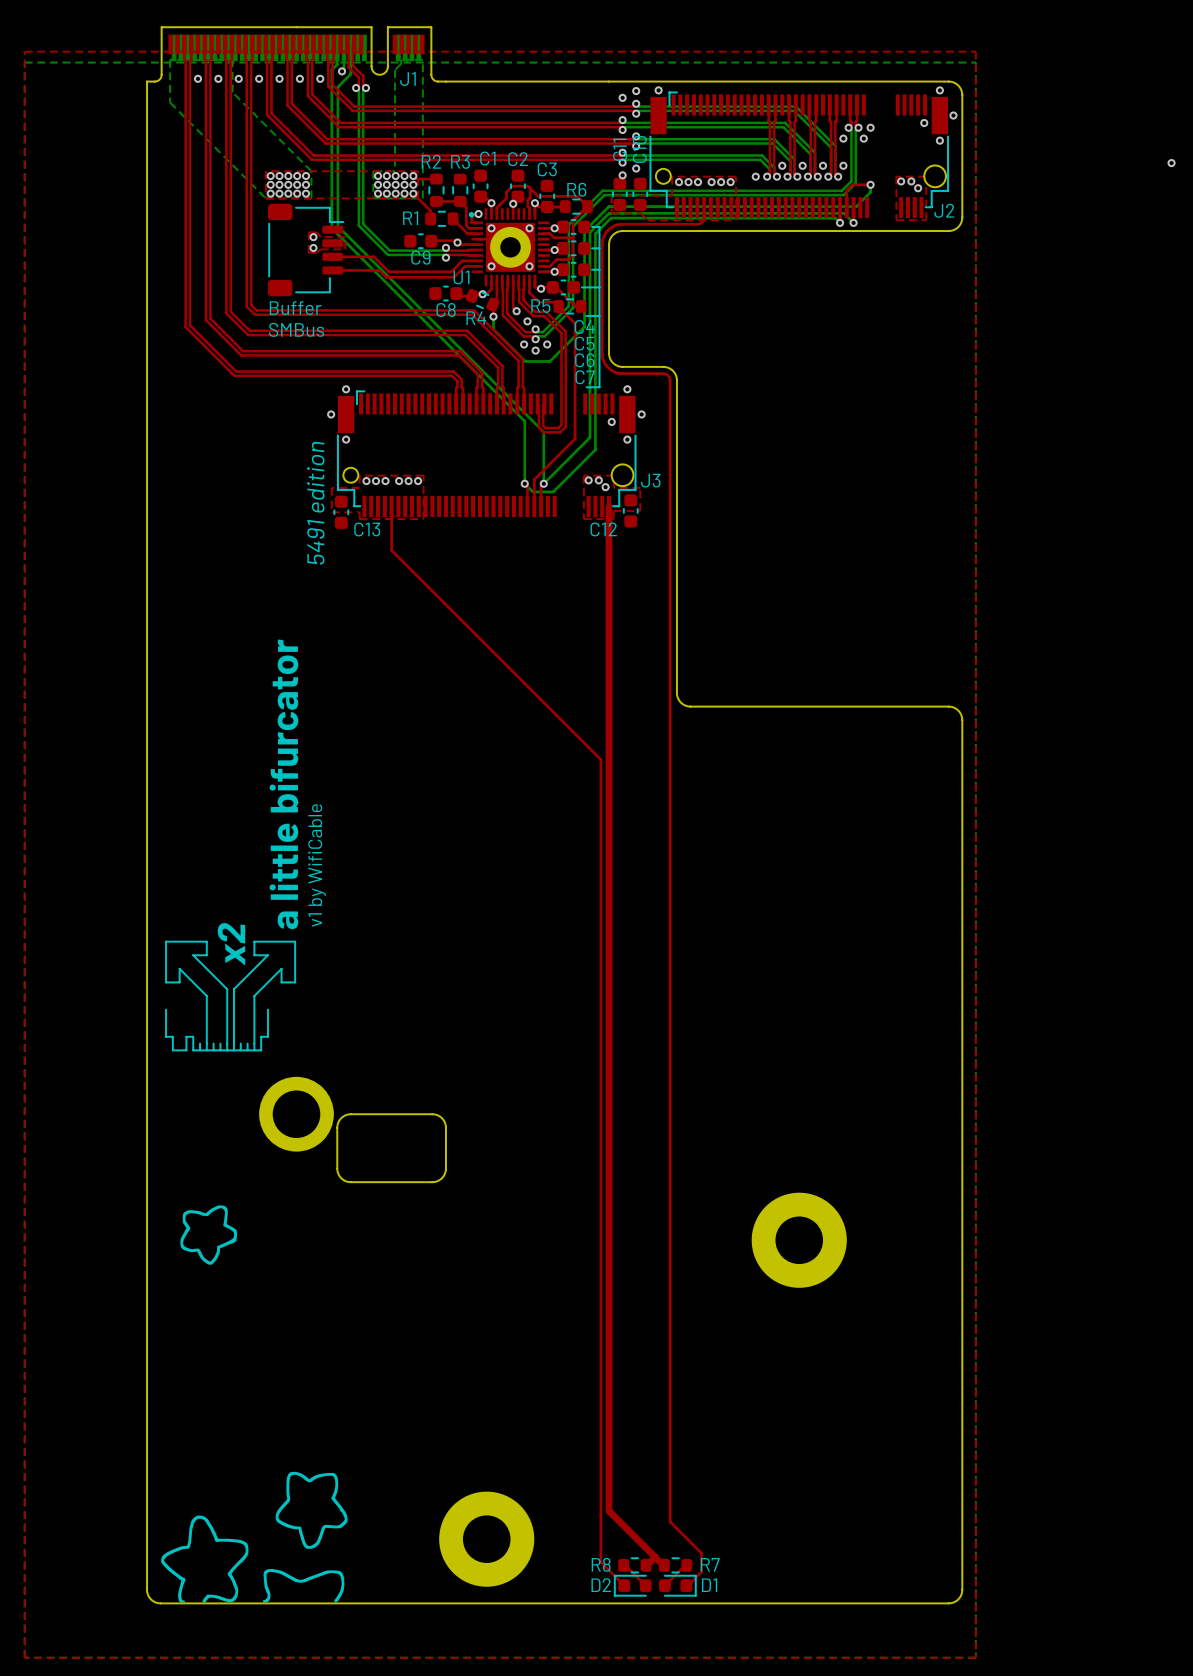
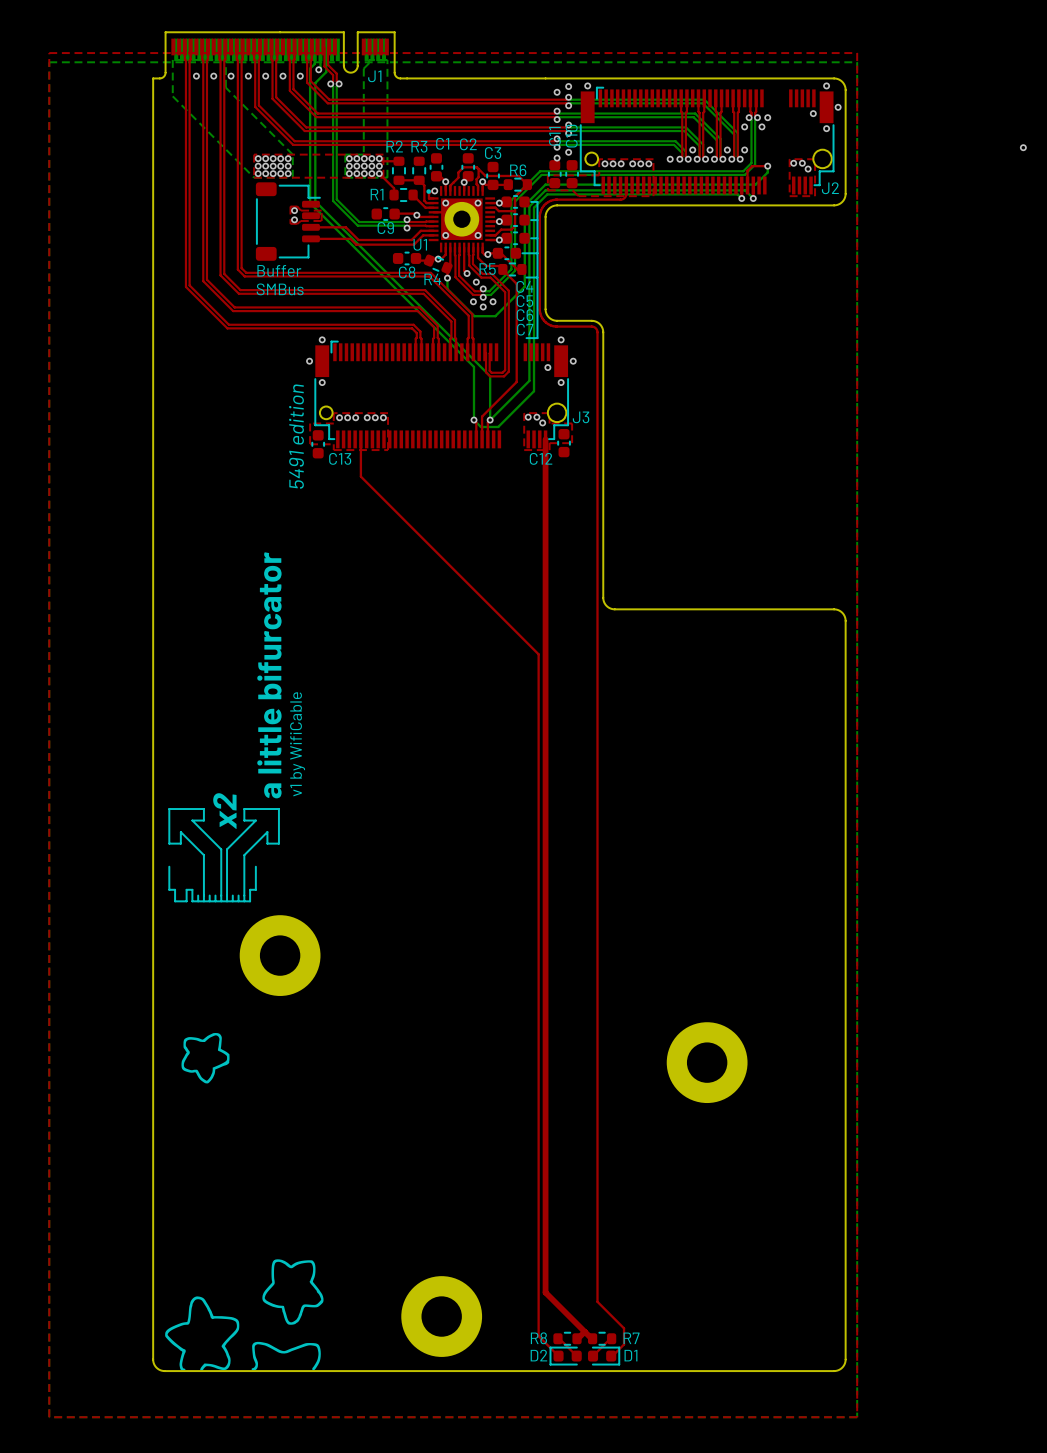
part footprint: [259, 1076, 334, 1152] -> [239, 915, 321, 996]
board edge: (350, 1114) (432, 1114) (439, 1116) (445, 1126) (445, 1168) (444, 1175) (439, 1180) (432, 1182) (350, 1182) (344, 1180) (337, 1170) (337, 1126) (342, 1117) (350, 1114) -> none

